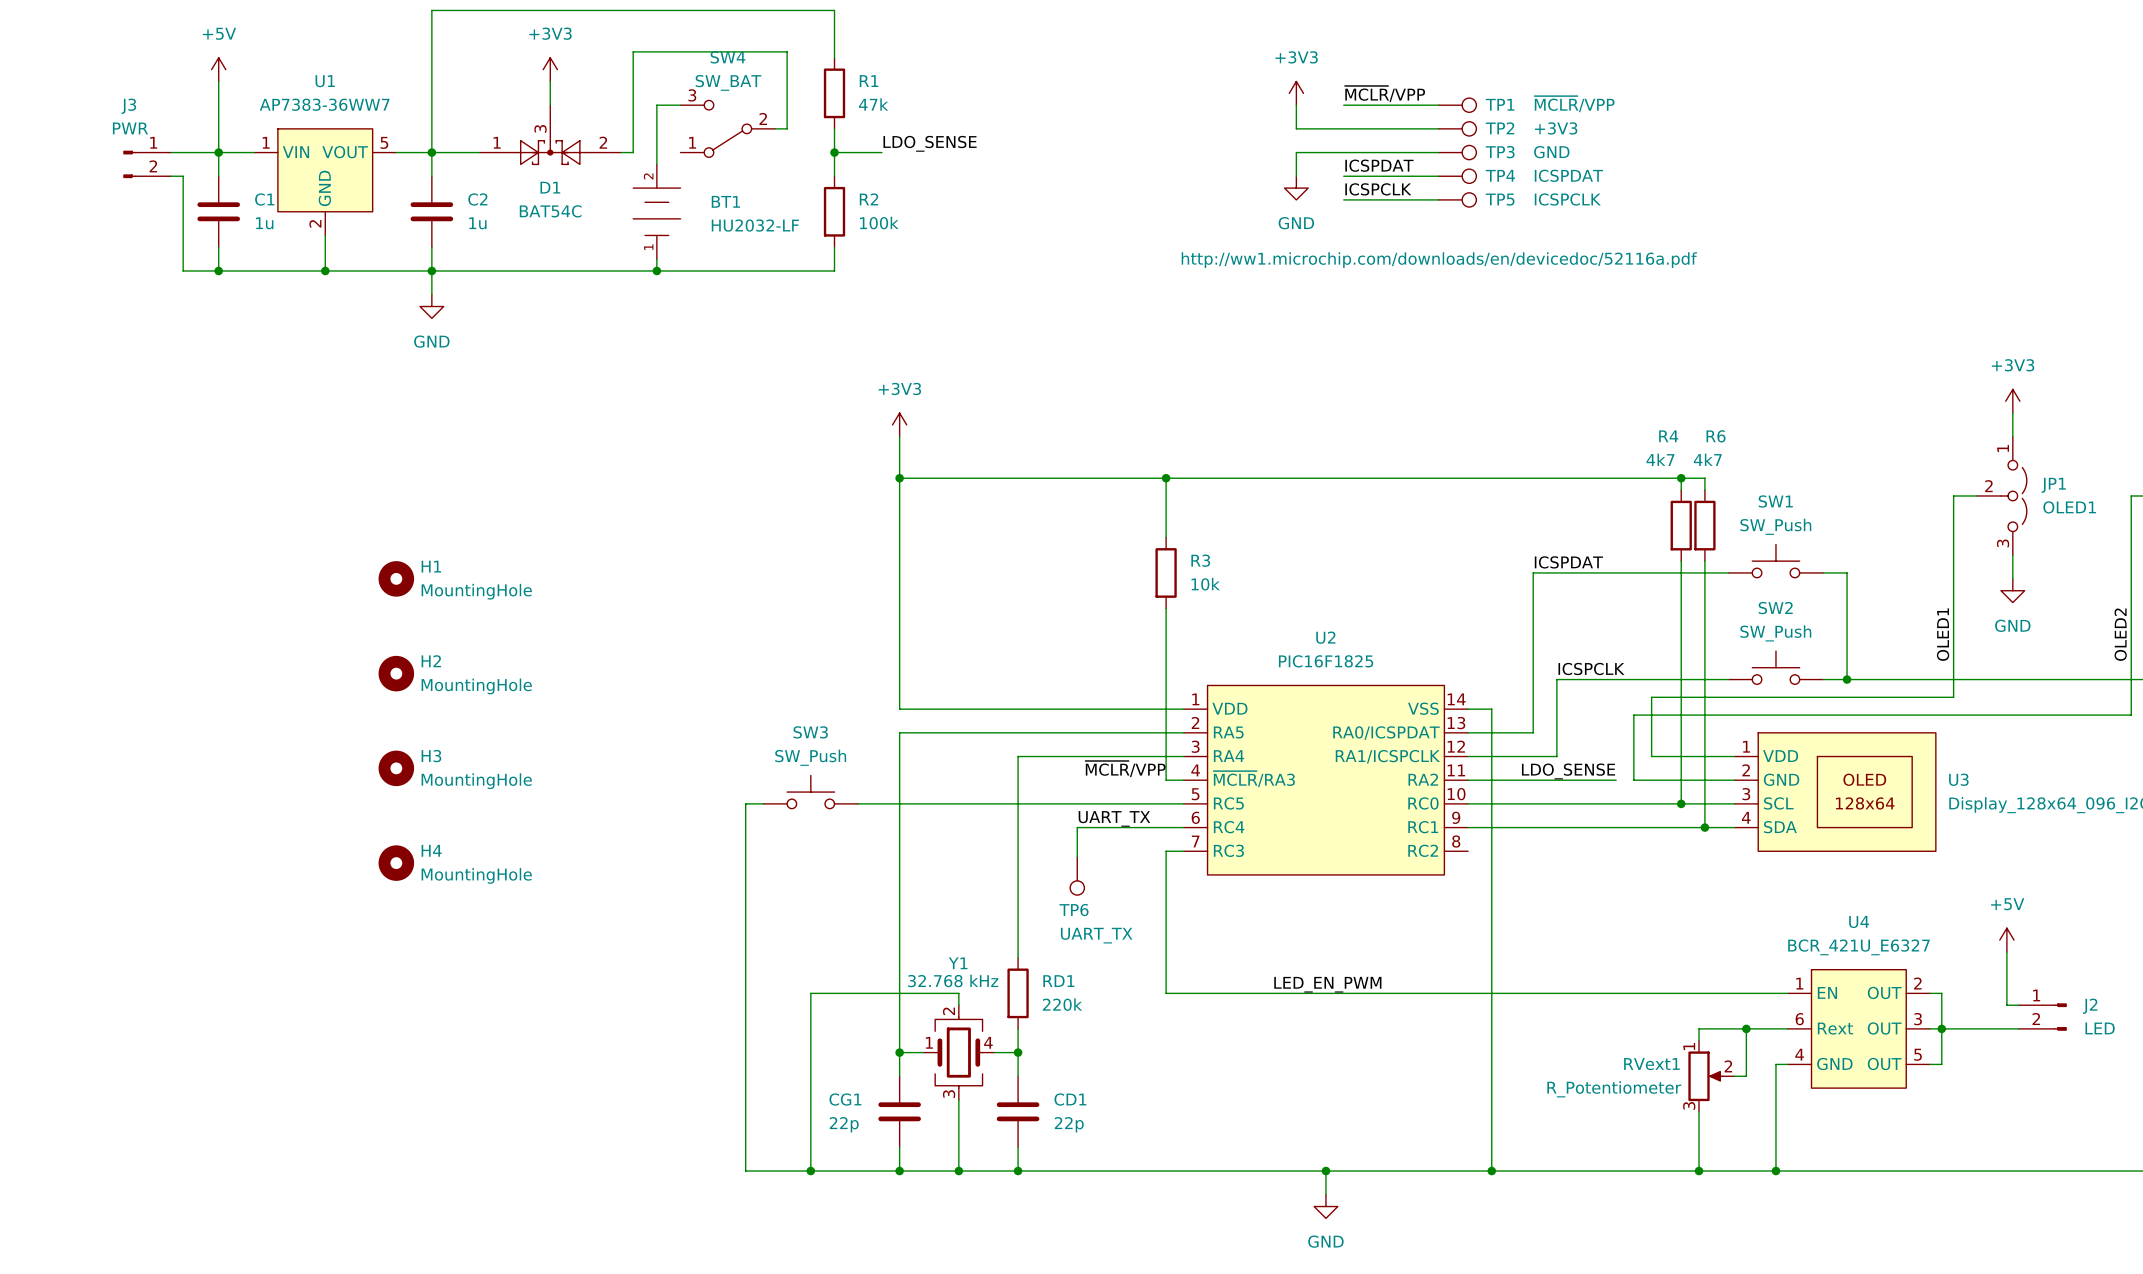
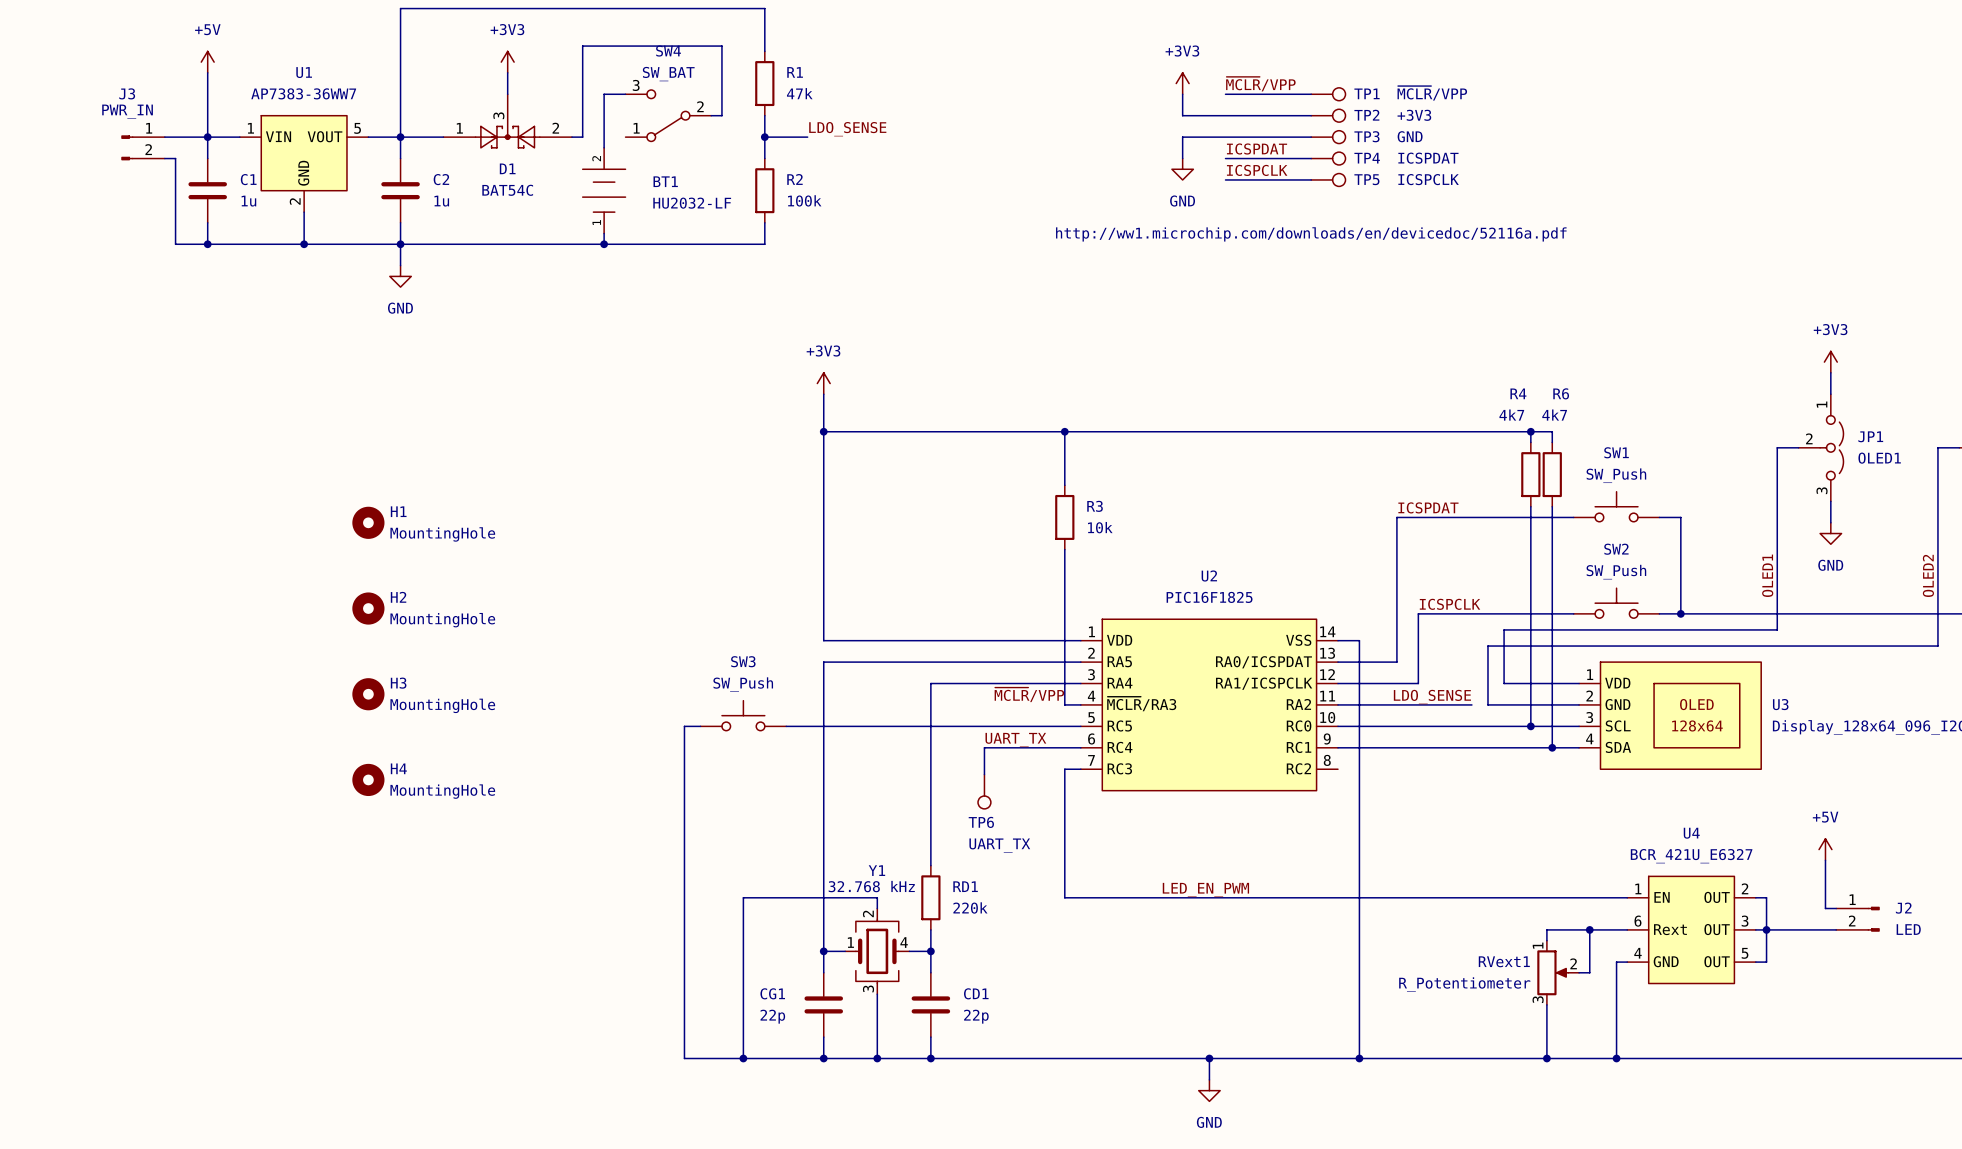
J3 value: PWR (130, 128) -> PWR_IN (127, 111)

